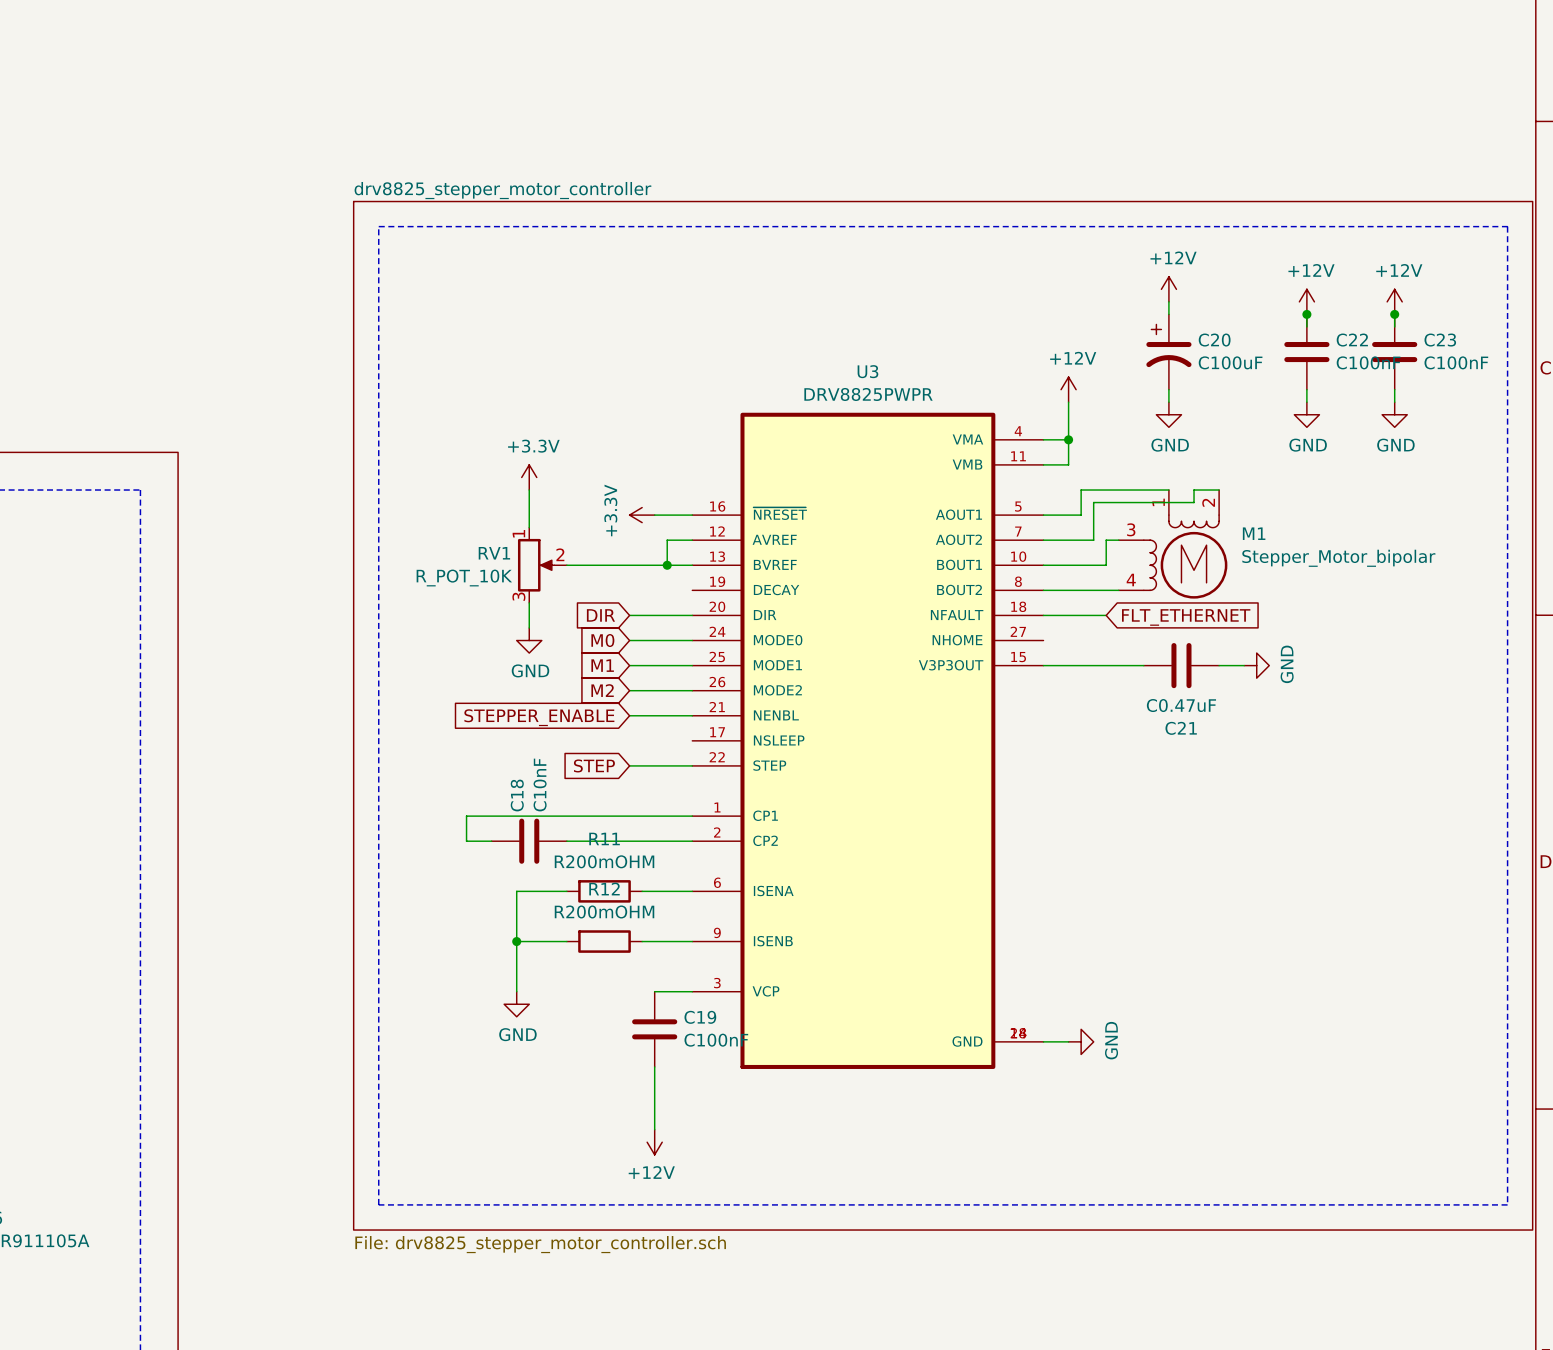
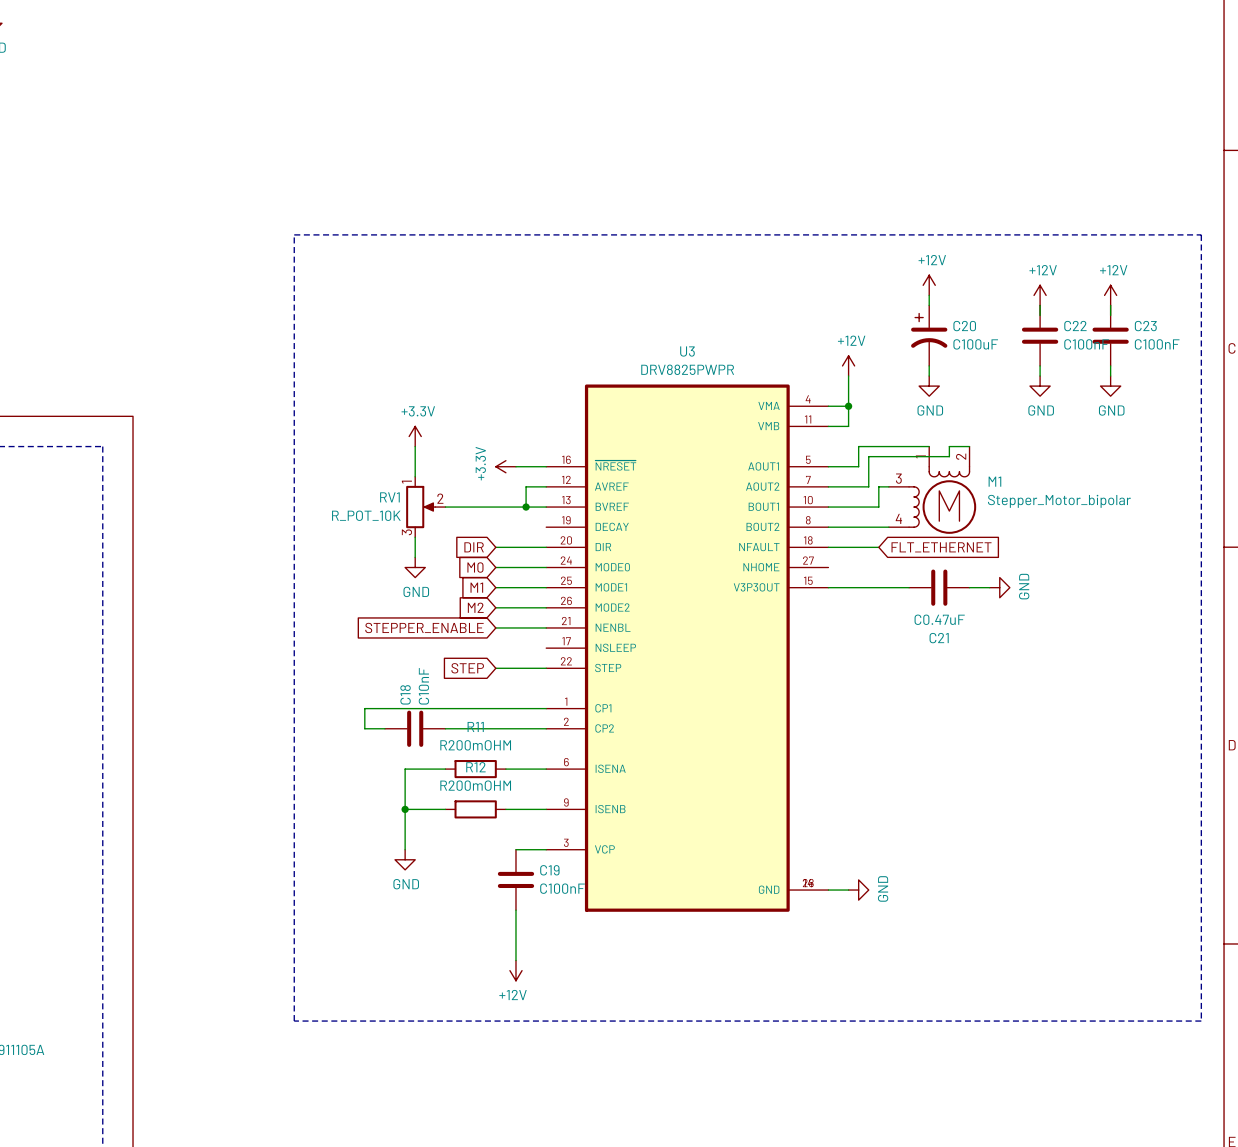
junction: (1306, 314) -> none
junction: (1394, 314) -> none
sheet drv8825_stepper_motor_controller: File: drv8825_stepper_motor_controller.sch (943, 715) -> none

